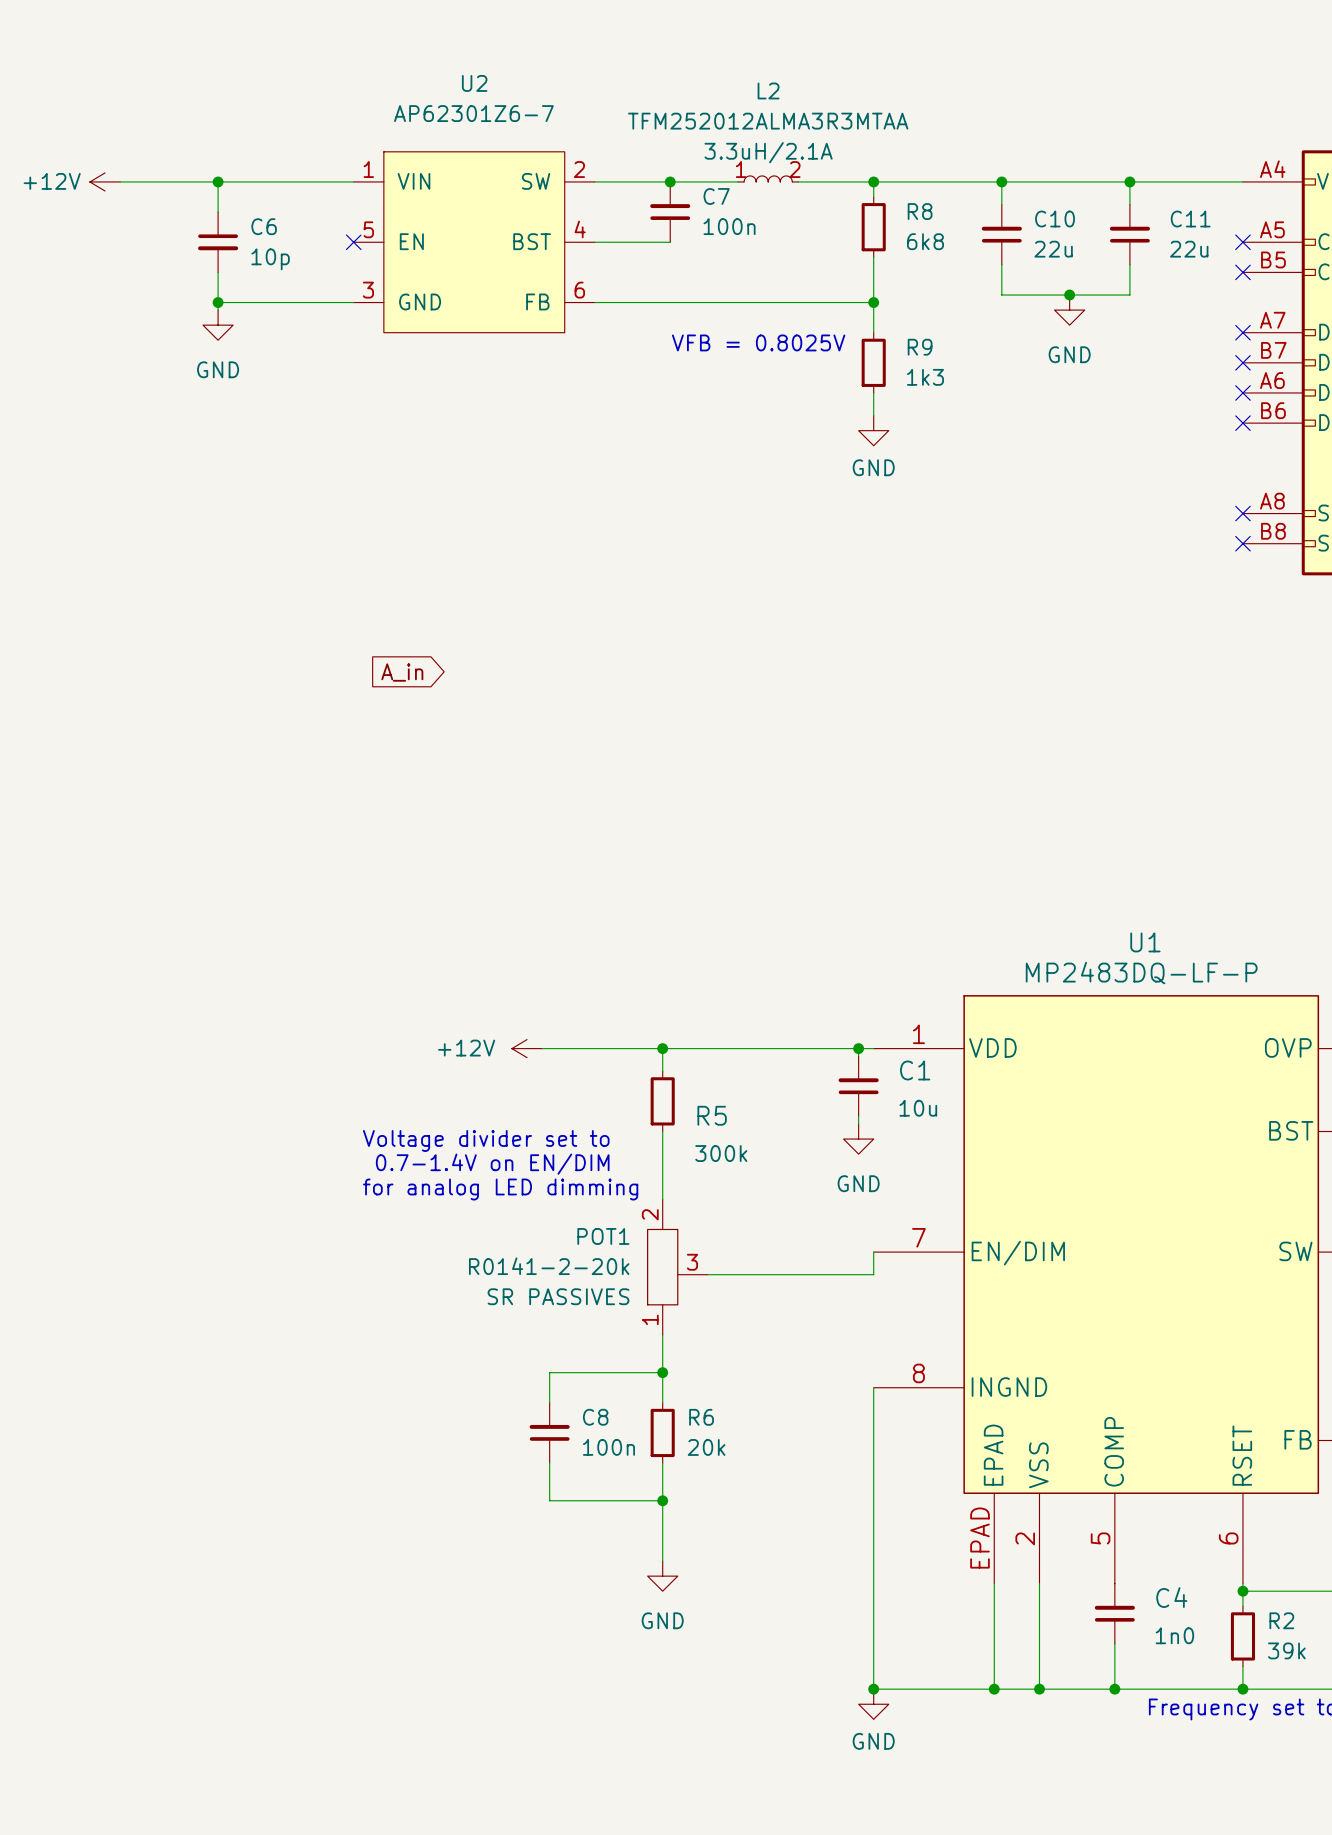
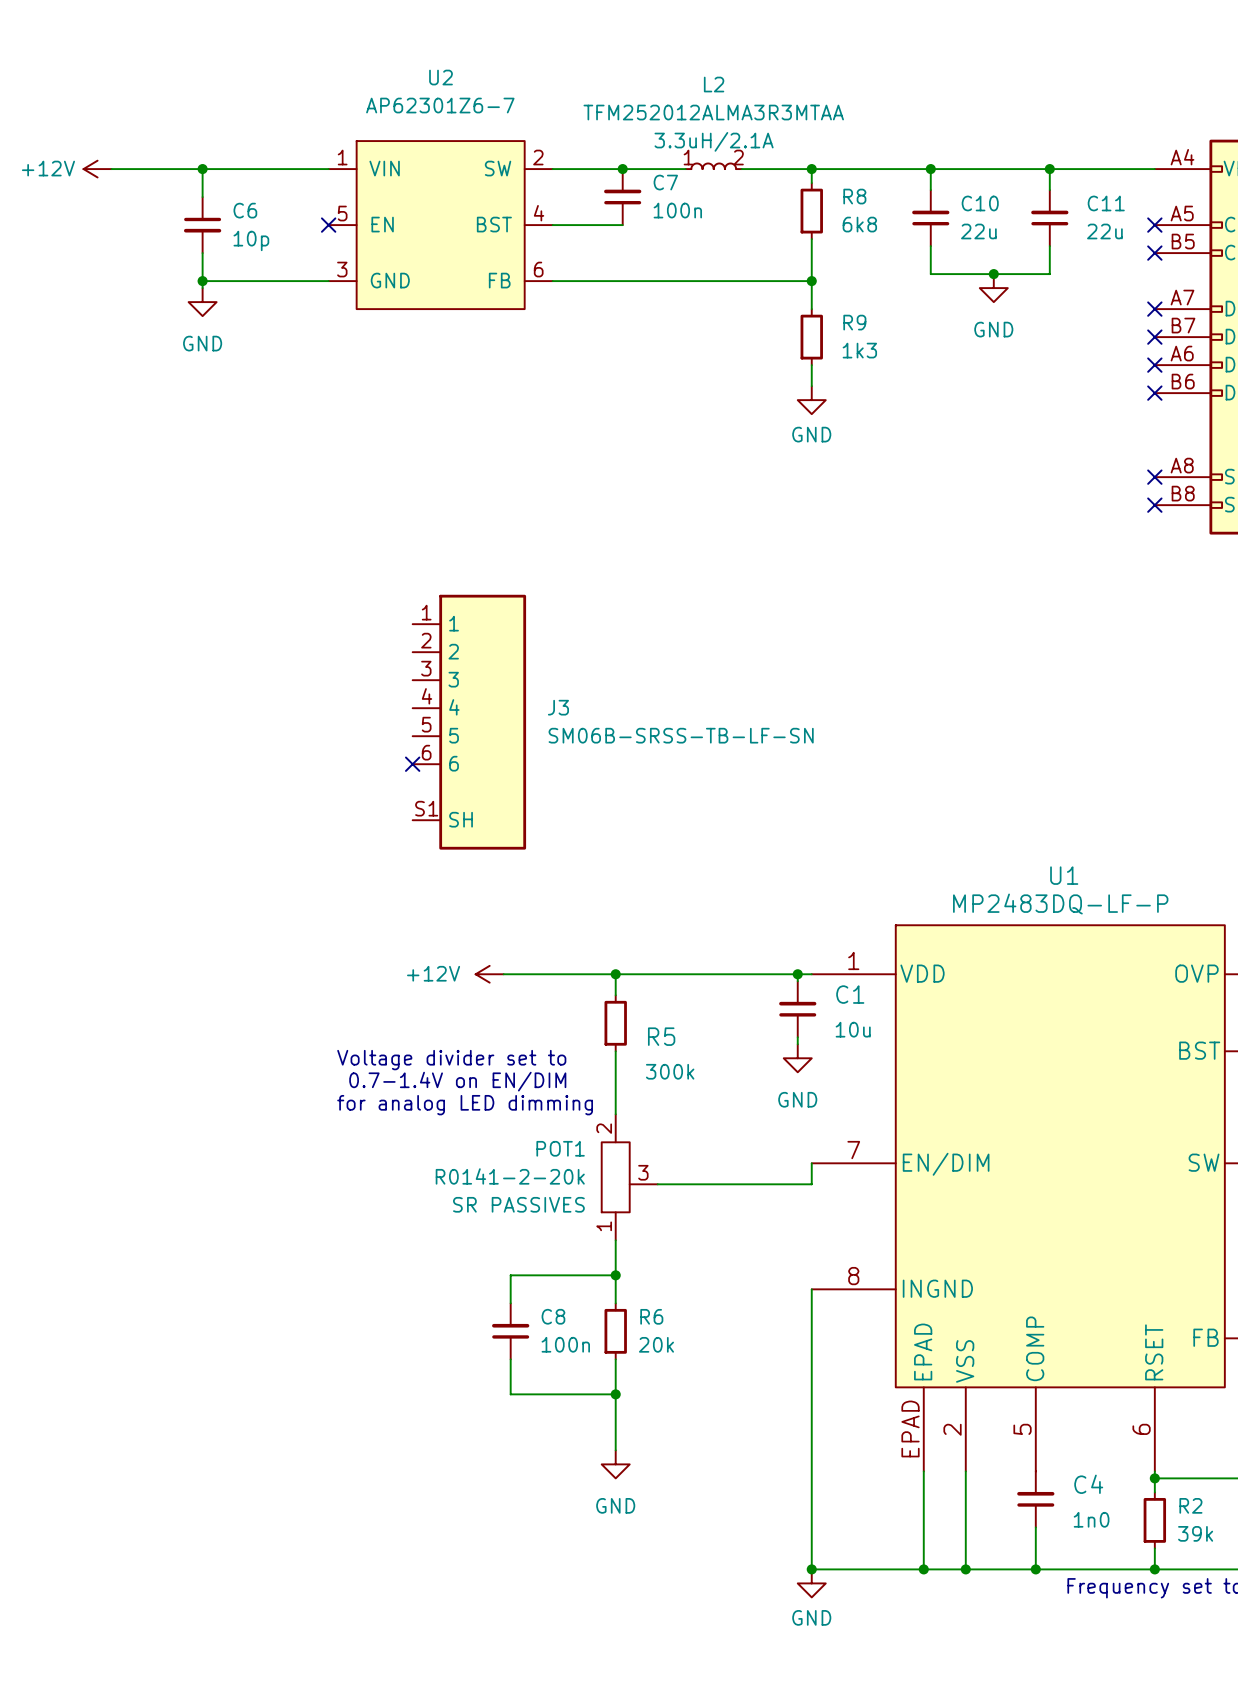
text: VFB = 0.8025V (758, 342) -> none
global label: A_in (402, 672) -> none
J3: none -> SM06B-SRSS-TB-LF-SN (469, 722)
no-connect mark: none -> (412, 764)

